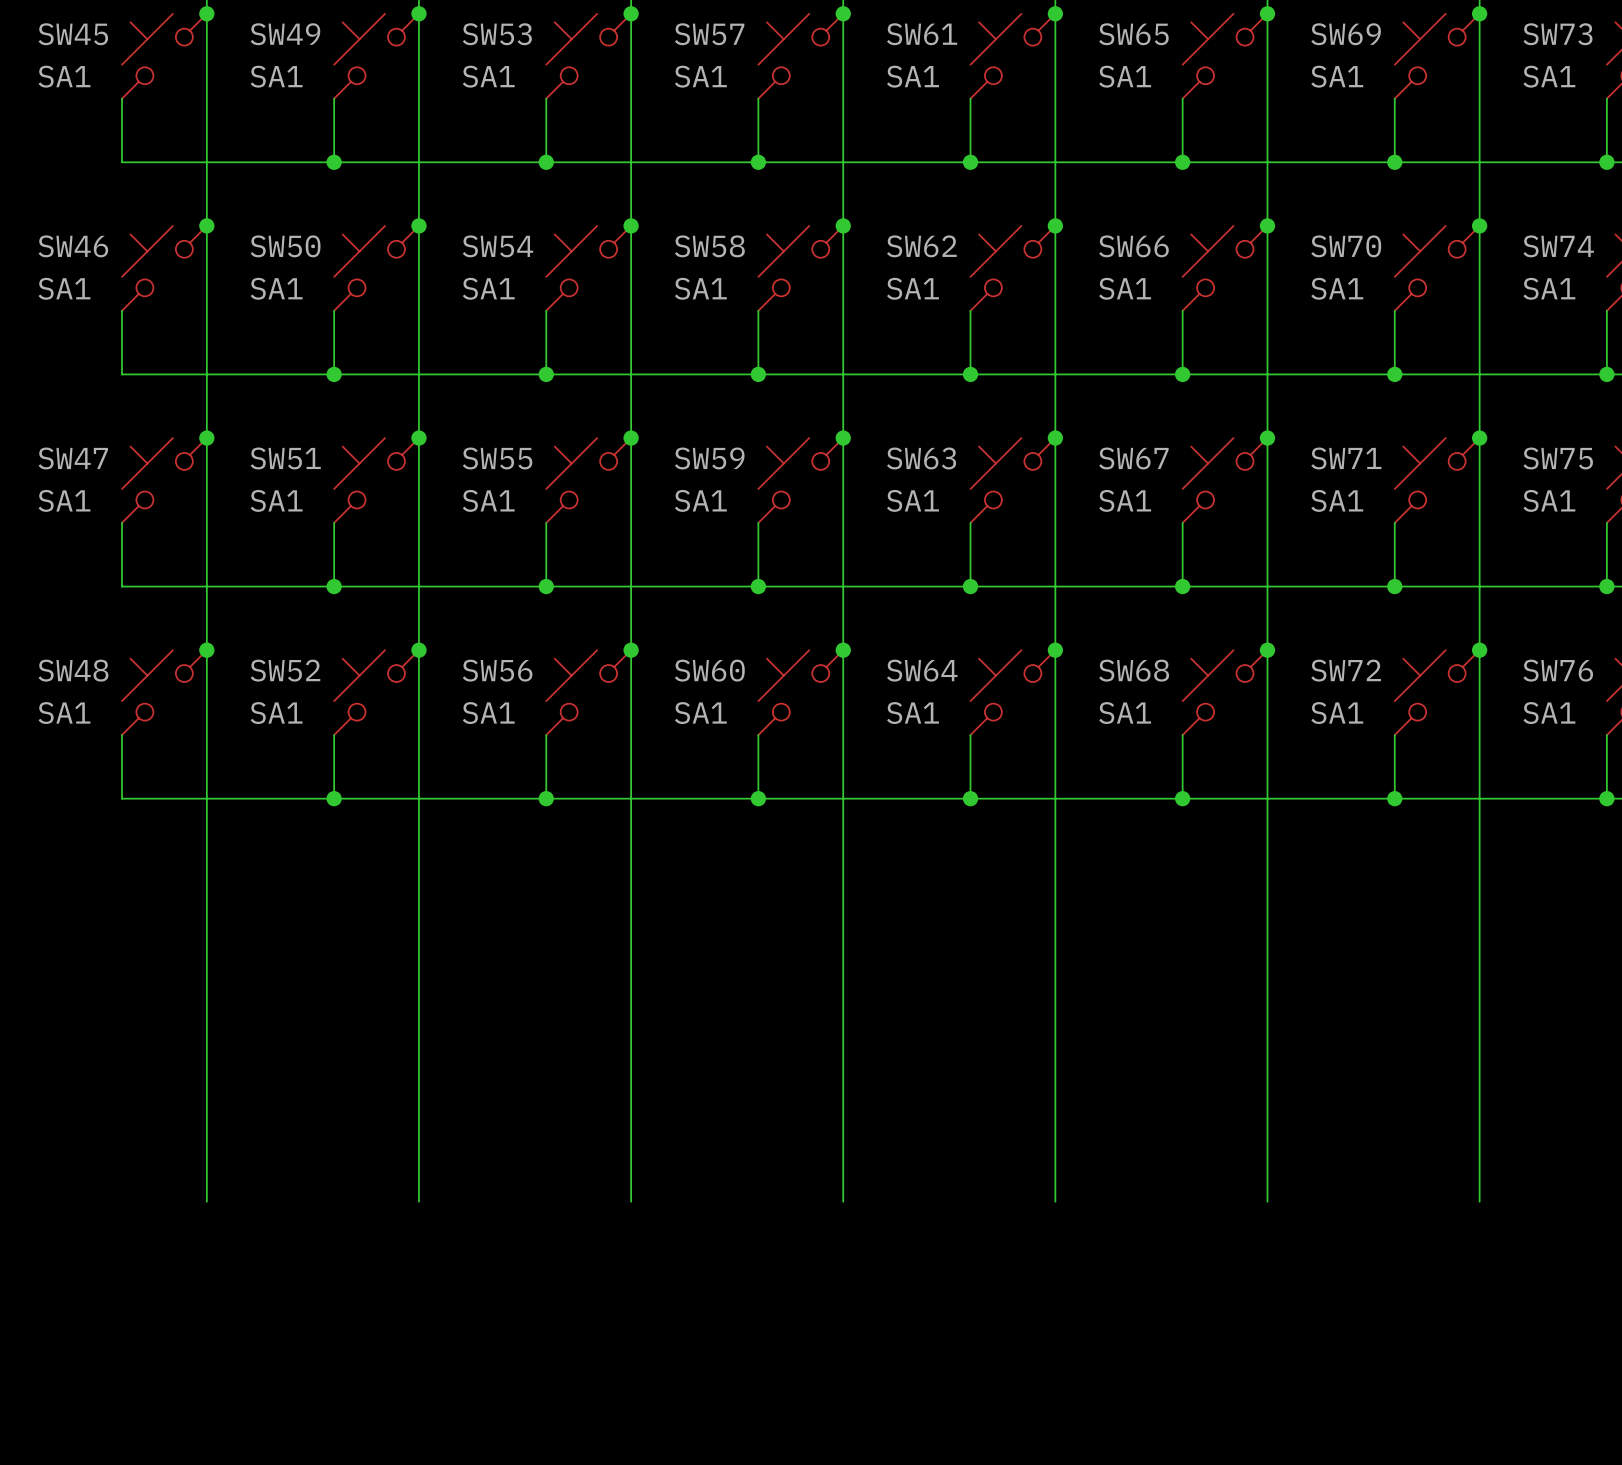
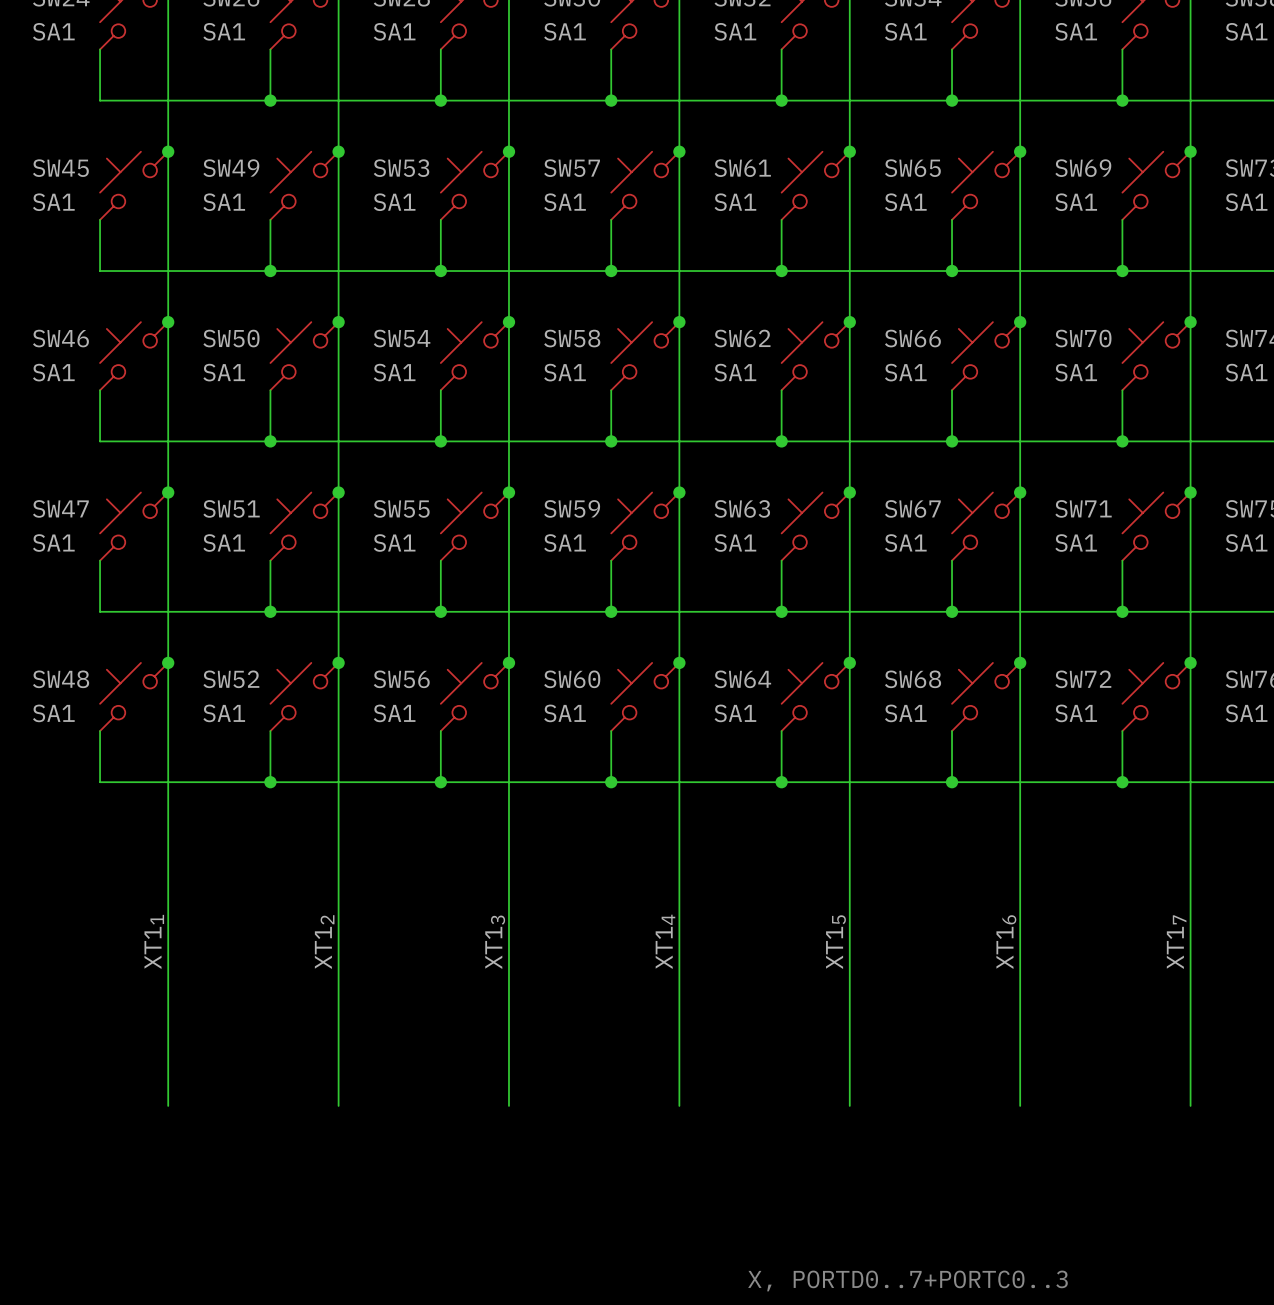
label: none -> XT11 (154, 941)
label: none -> XT12 (324, 942)
label: none -> XT13 (495, 942)
label: none -> XT14 (665, 941)
label: none -> XT15 (835, 942)
label: none -> XT16 (1006, 942)
label: none -> XT17 (1176, 942)
text: none -> X, PORTD0..7+PORTC0..3 (907, 1280)

